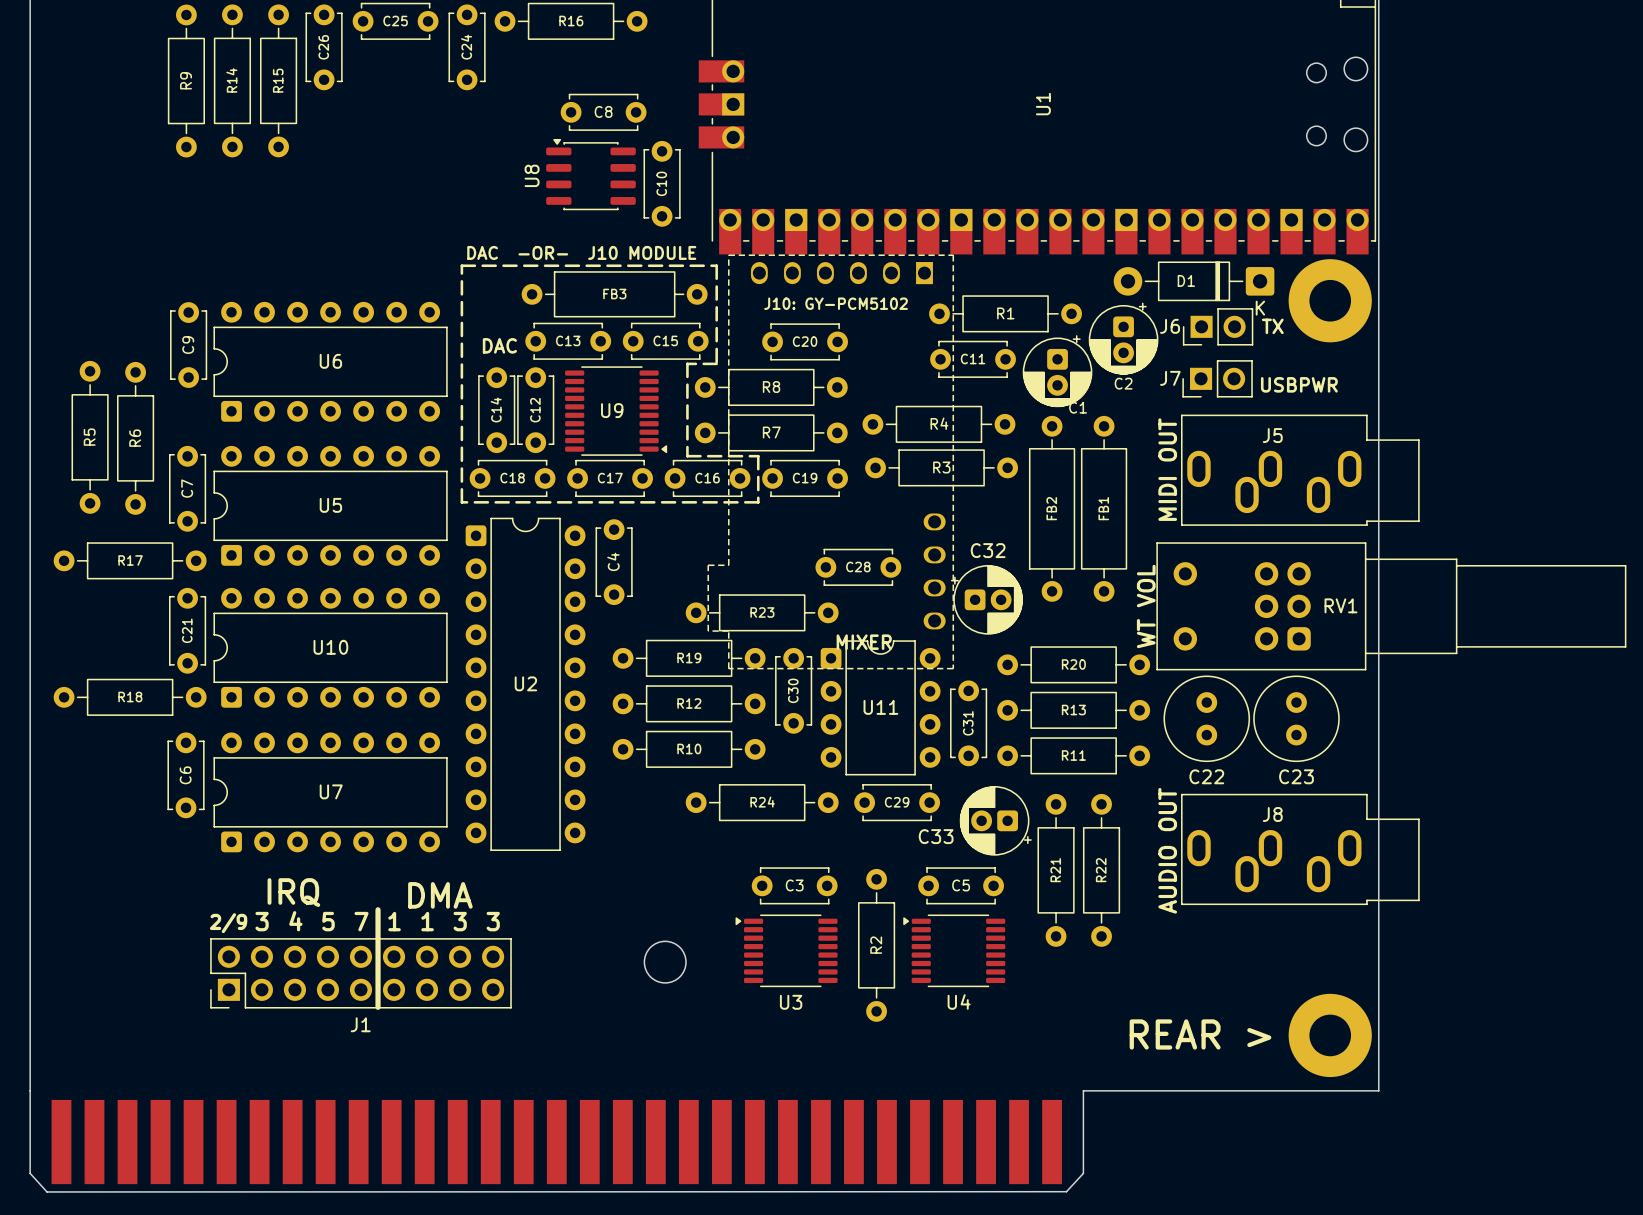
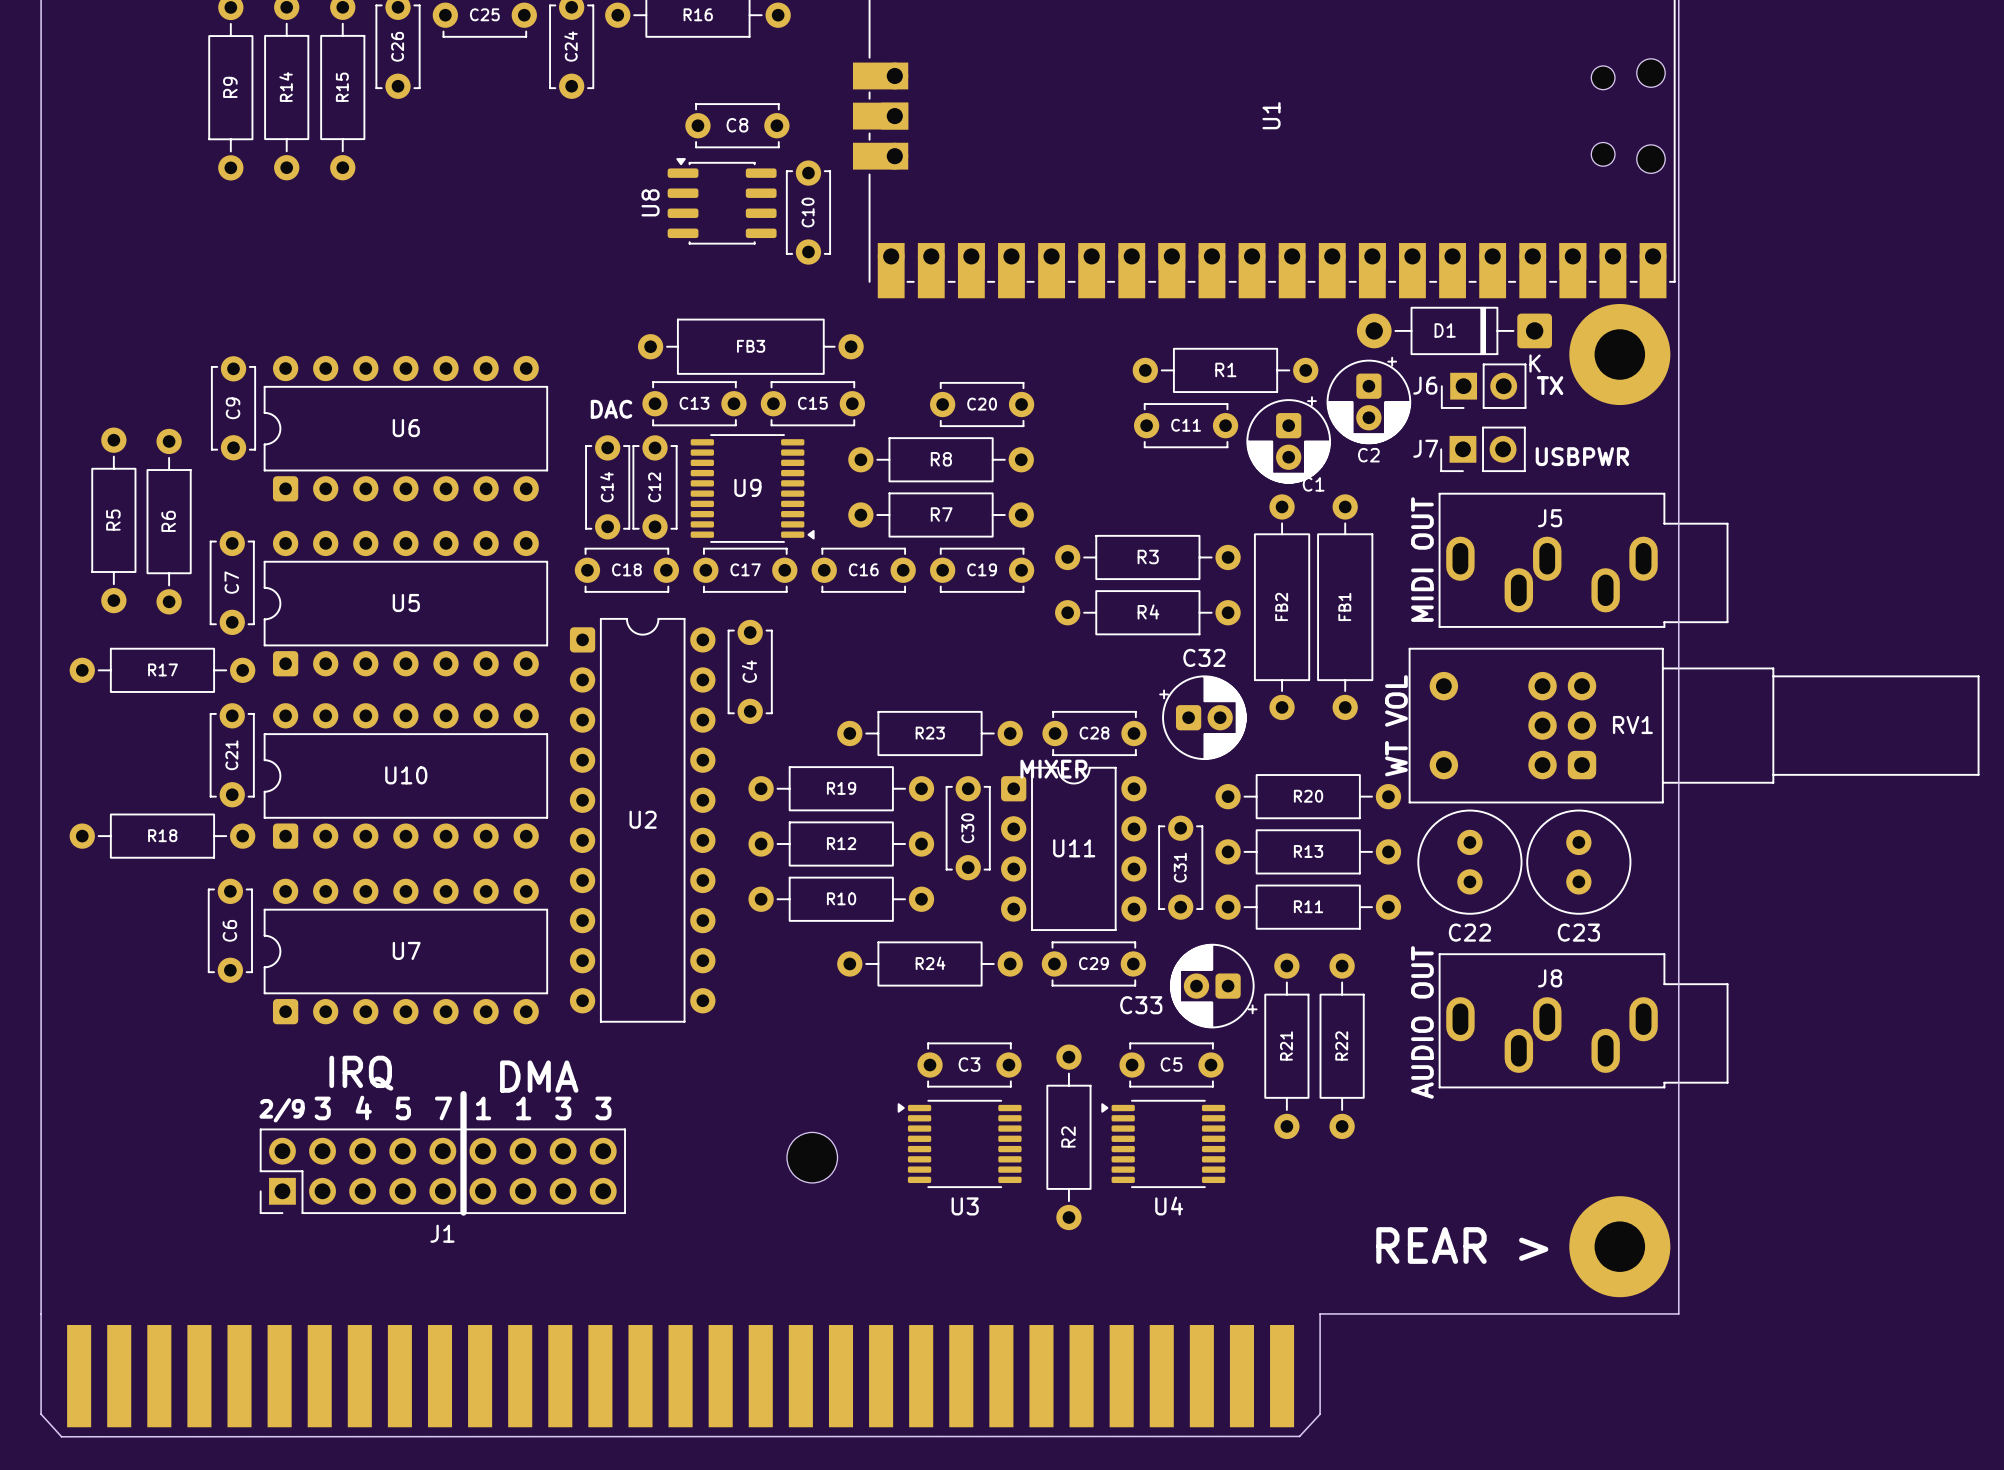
text: DAC -OR- J10 MODULE (581, 252) -> none
line: (474, 265) (461, 265) (461, 273) -> none
line: (482, 265) (495, 265) -> none
line: (503, 265) (516, 265) -> none
line: (524, 265) (537, 265) -> none
line: (545, 265) (558, 265) -> none
line: (565, 265) (578, 265) -> none
line: (586, 265) (599, 265) -> none
line: (607, 265) (620, 265) -> none
line: (628, 265) (641, 265) -> none
line: (649, 265) (662, 265) -> none
line: (669, 265) (682, 265) -> none
line: (690, 265) (703, 265) -> none
line: (711, 265) (716, 265) (716, 278) -> none
line: (461, 281) (461, 294) -> none
line: (716, 286) (716, 299) -> none
line: (461, 302) (461, 315) -> none
text: J10: GY-PCM5102 (836, 303) -> none
line: (716, 307) (716, 320) -> none
line: (461, 322) (461, 335) -> none
line: (716, 328) (716, 341) -> none
line: (461, 343) (461, 356) -> none
line: (716, 348) (716, 361) -> none
line: (695, 363) (687, 363) (687, 376) -> none
line: (703, 363) (716, 363) -> none
line: (461, 364) (461, 377) -> none
line: (687, 384) (687, 397) -> none
line: (461, 385) (461, 398) -> none
line: (687, 405) (687, 418) -> none
line: (461, 406) (461, 419) -> none
R4 position: (938, 424) -> (1147, 612)
line: (461, 426) (461, 439) -> none
line: (687, 426) (687, 439) -> none
line: (461, 447) (461, 460) -> none
line: (687, 447) (687, 456) (700, 456) -> none
line: (708, 456) (721, 456) -> none
line: (729, 456) (742, 456) -> none
line: (749, 456) (758, 456) (758, 469) -> none
part: (830, 461) -> none
line: (461, 468) (461, 481) -> none
line: (758, 476) (758, 489) -> none
line: (461, 489) (461, 502) (467, 502) -> none
line: (758, 497) (758, 502) (745, 502) -> none
line: (474, 502) (487, 502) -> none
line: (495, 502) (508, 502) -> none
line: (516, 502) (529, 502) -> none
line: (537, 502) (550, 502) -> none
line: (558, 502) (571, 502) -> none
line: (578, 502) (591, 502) -> none
line: (599, 502) (612, 502) -> none
line: (620, 502) (633, 502) -> none
line: (641, 502) (654, 502) -> none
line: (662, 502) (675, 502) -> none
line: (682, 502) (695, 502) -> none
line: (703, 502) (716, 502) -> none
line: (724, 502) (737, 502) -> none
C28 position: (858, 567) -> (1094, 733)

